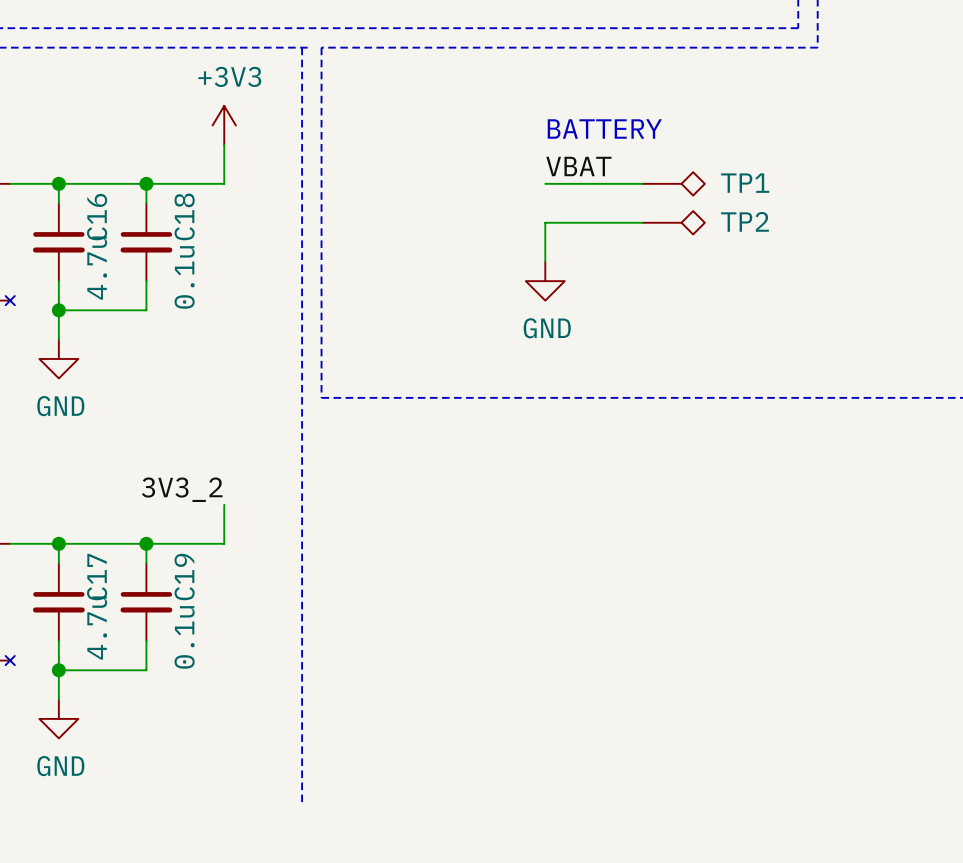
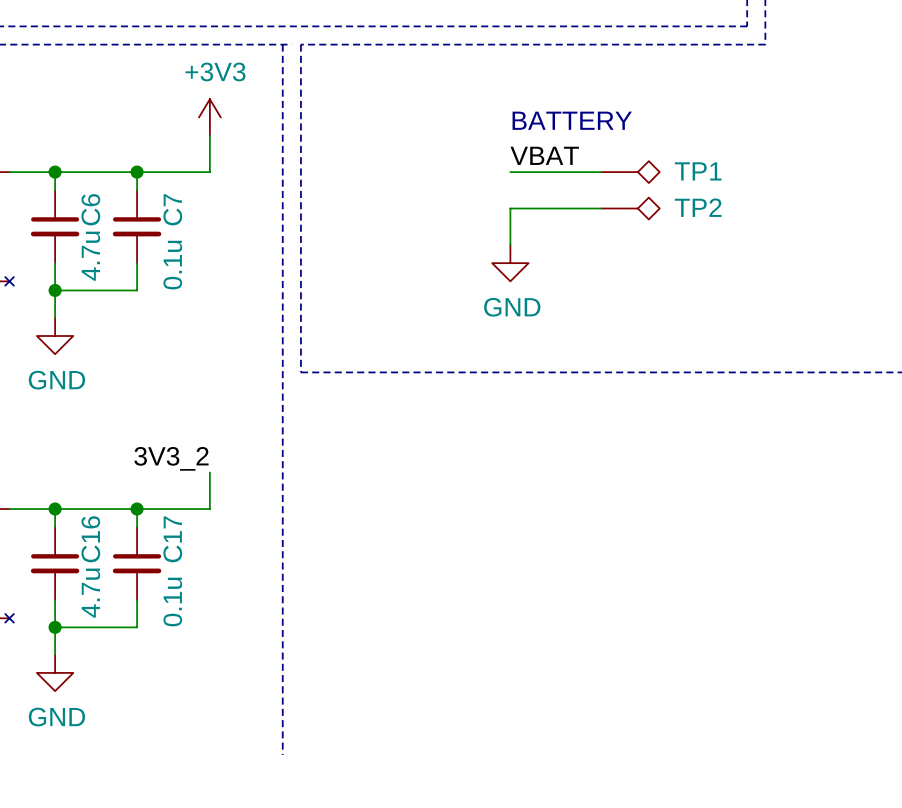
C18 name: C18 (184, 216) -> C7 (172, 209)
C16 name: C16 (97, 217) -> C6 (90, 209)
C17 name: C17 (97, 577) -> C16 (90, 539)
C19 name: C19 (184, 577) -> C17 (172, 539)

